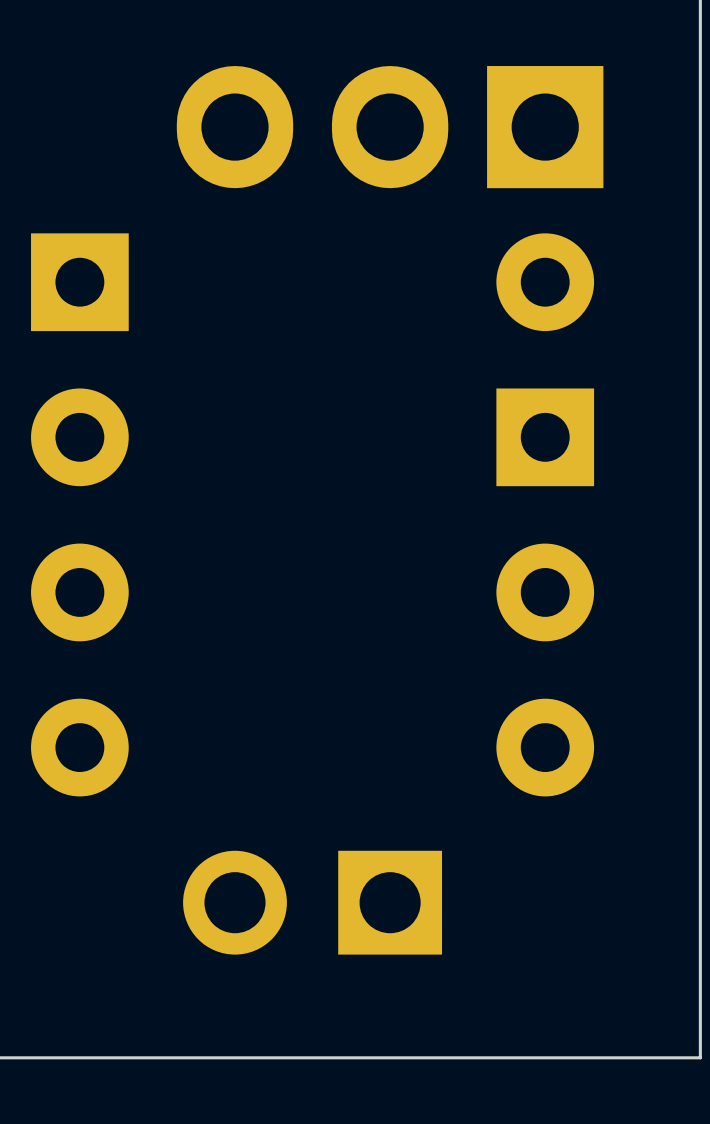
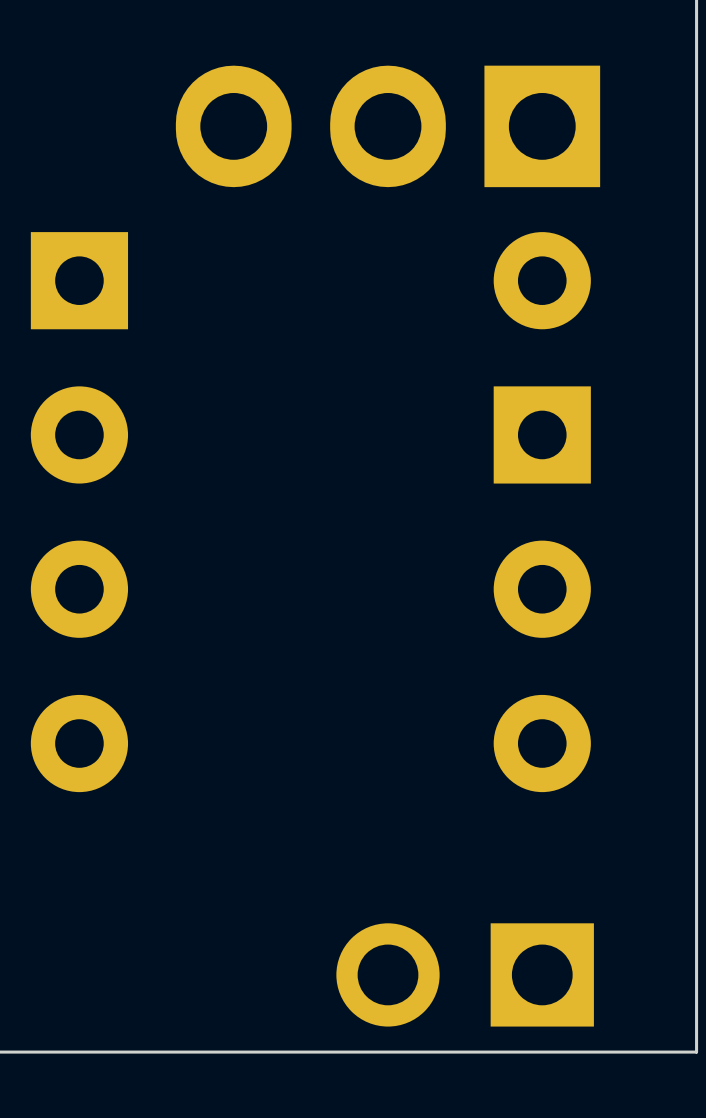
part position: (312, 902) -> (465, 974)

